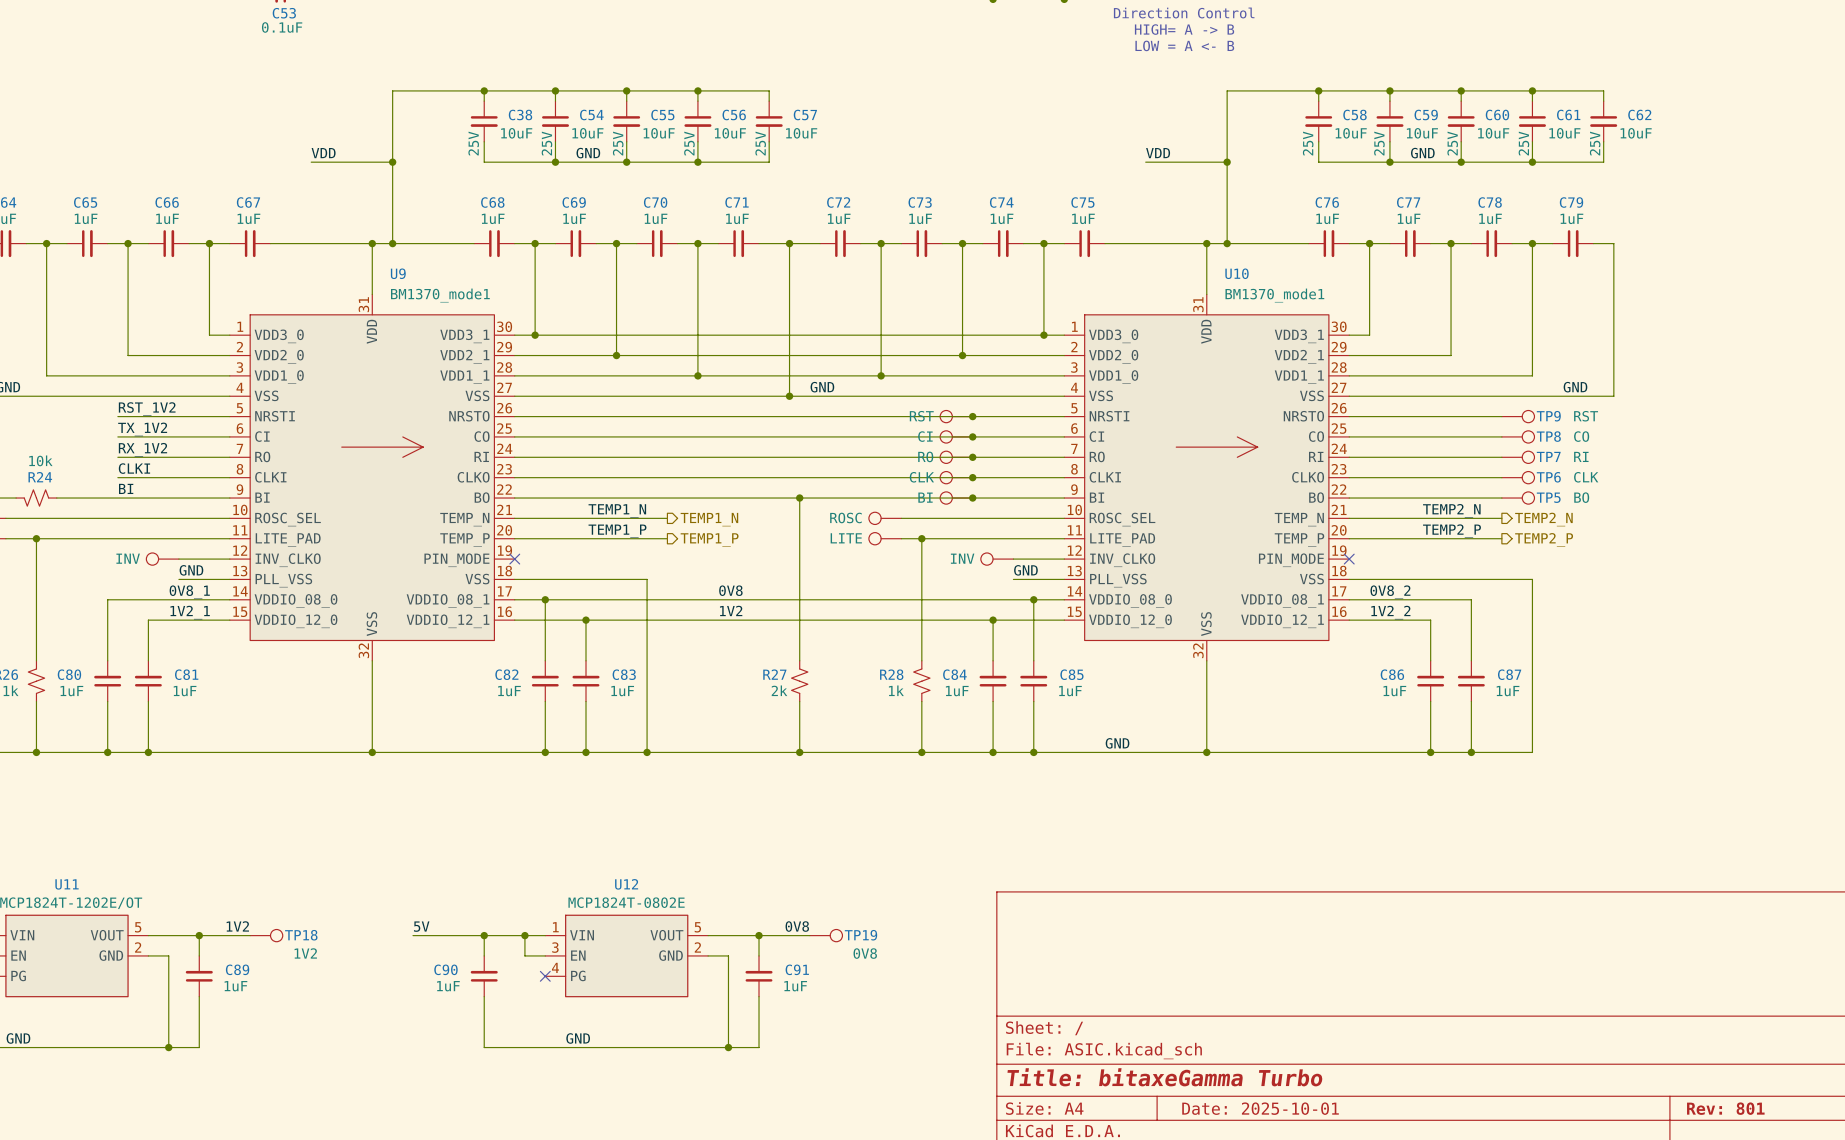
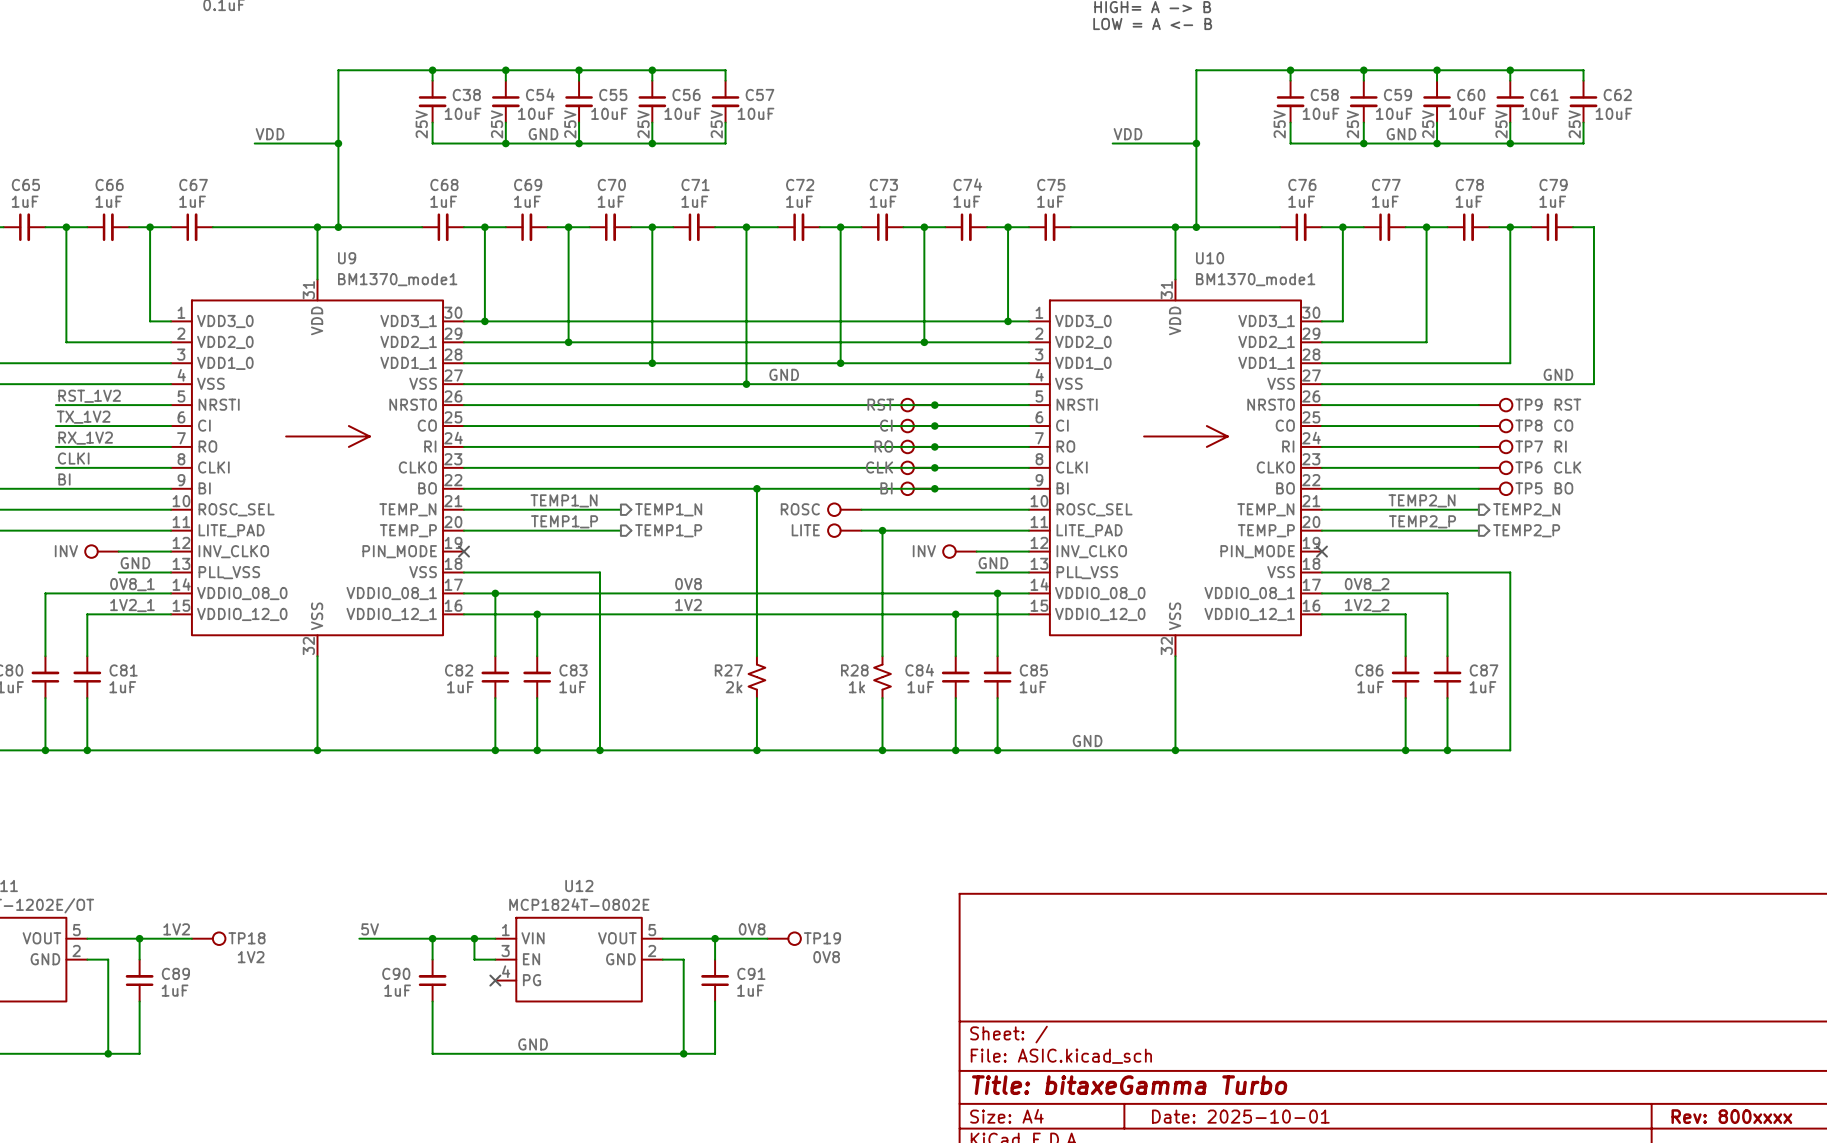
title block: Rev: 801 (1725, 1108) -> Rev: 800xxxx (1731, 1116)

